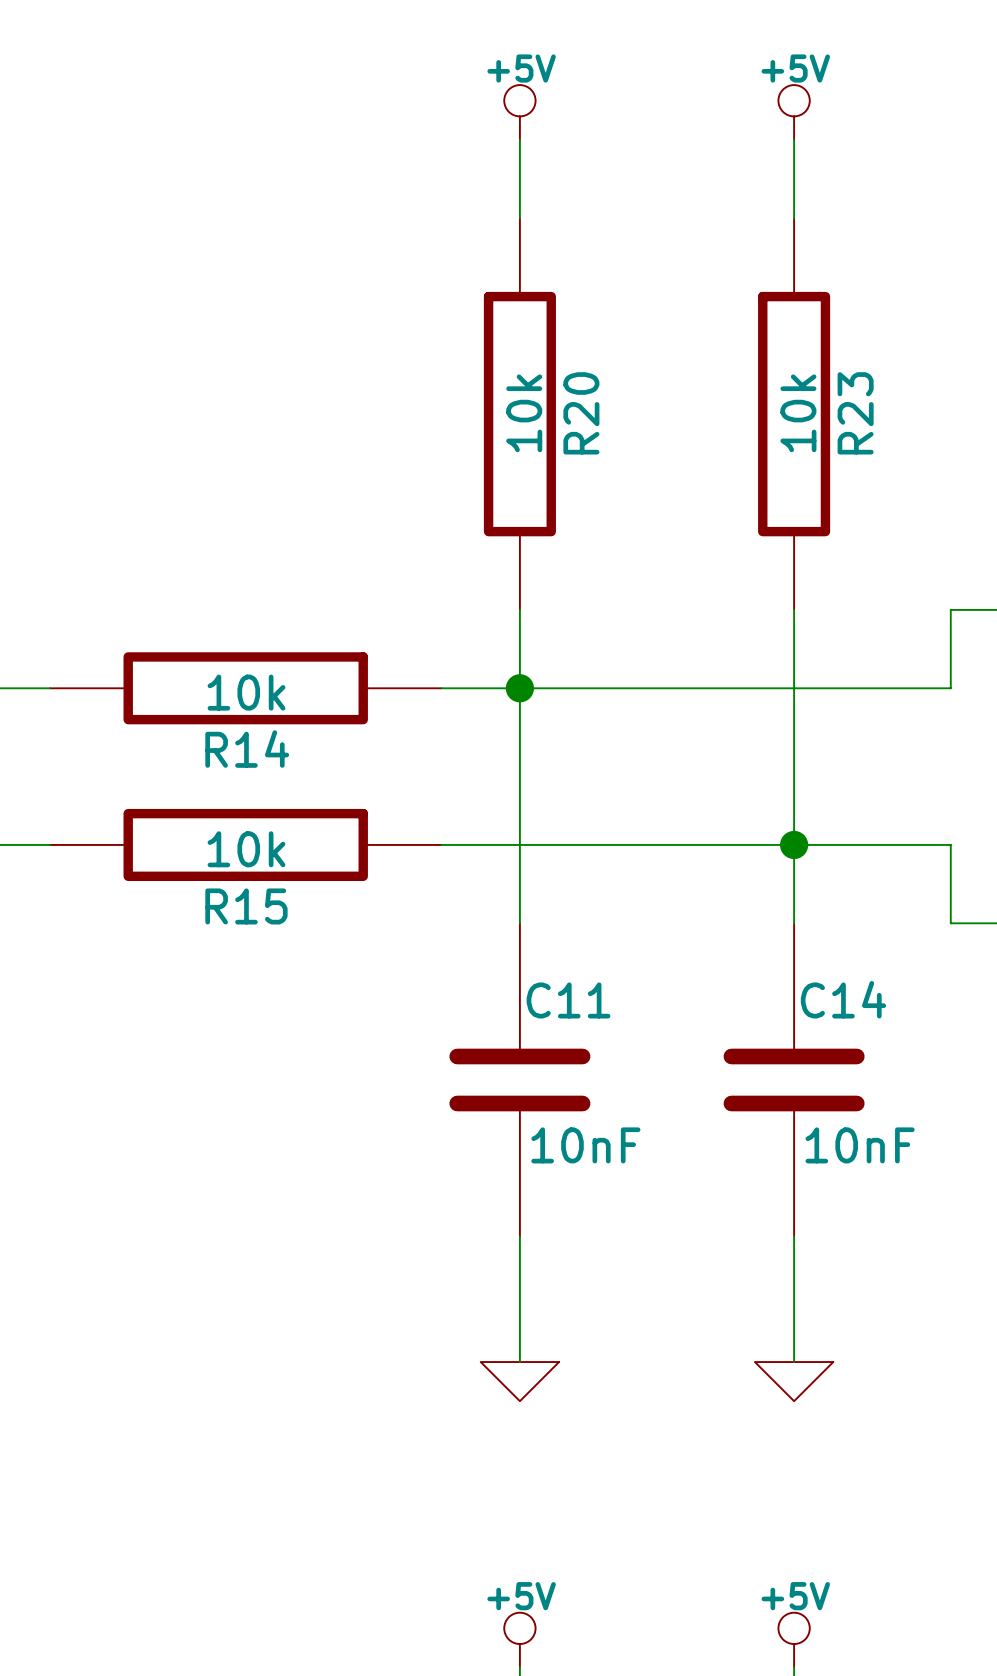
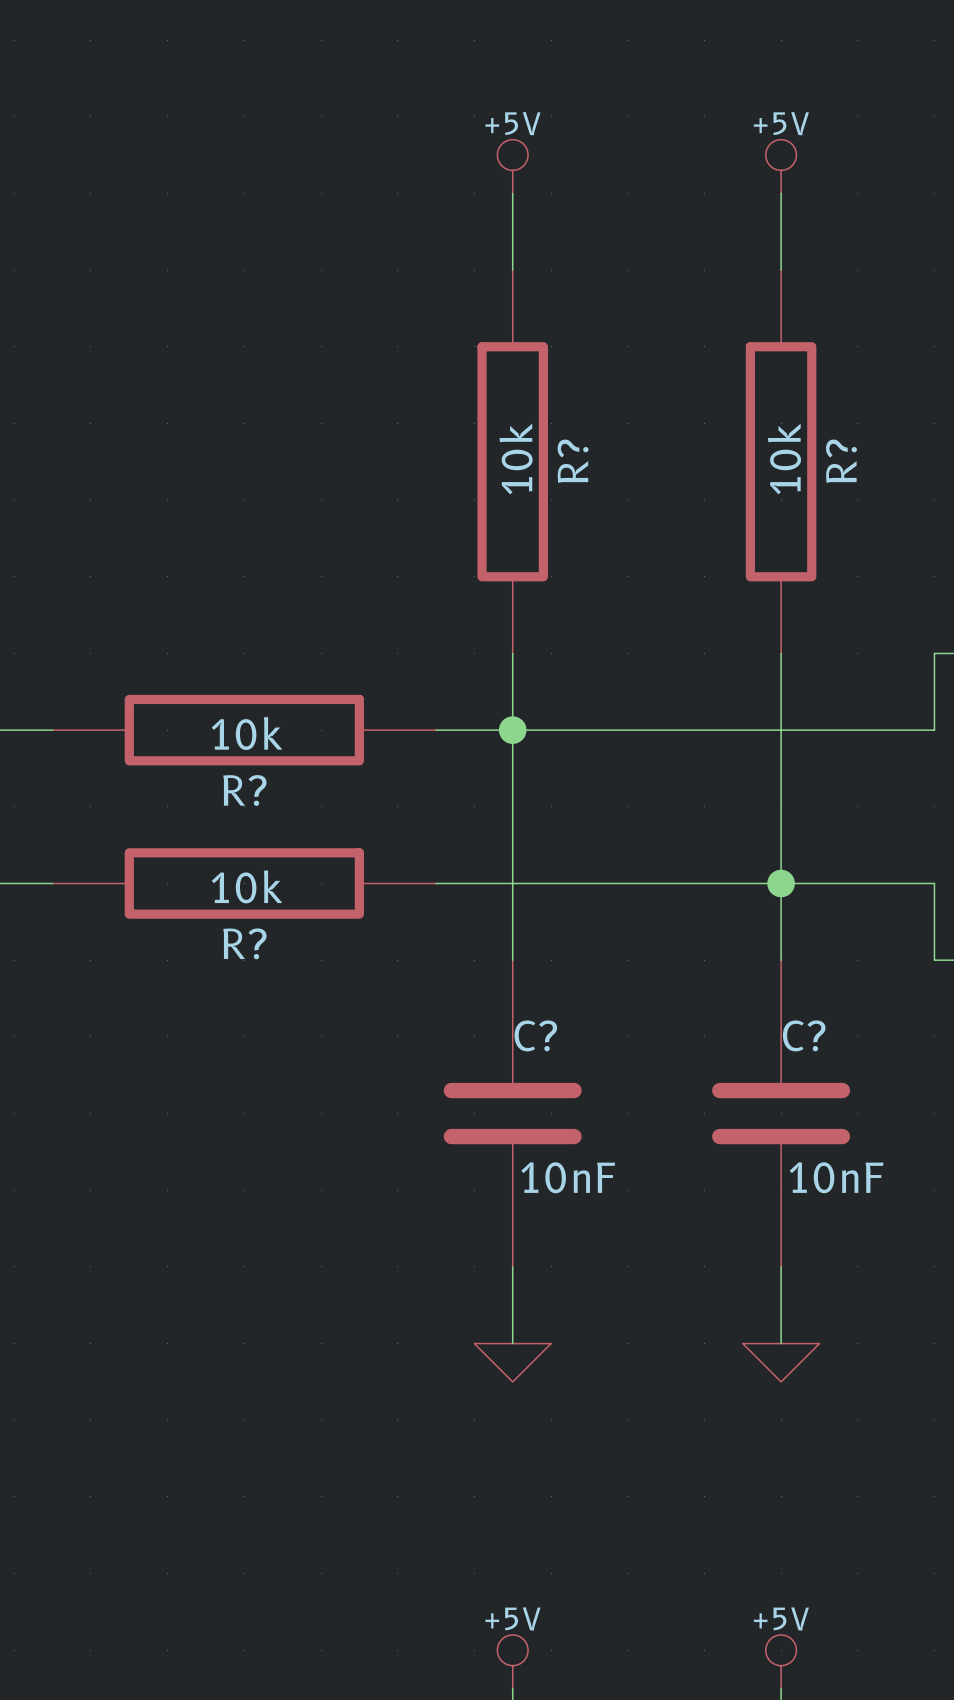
R20 name: R20 (581, 413) -> R? (573, 461)
R23 name: R23 (855, 413) -> R? (841, 461)
R14 name: R14 (247, 749) -> R? (244, 790)
R15 name: R15 (246, 906) -> R? (244, 943)
C14 name: C14 (843, 999) -> C? (804, 1035)
C11 name: C11 (568, 1000) -> C? (535, 1035)
wire: (519, 1315) (519, 1362) -> none
wire: (794, 1315) (794, 1362) -> none
power symbol position: (519, 1381) -> (512, 1362)
power symbol position: (794, 1381) -> (781, 1362)

